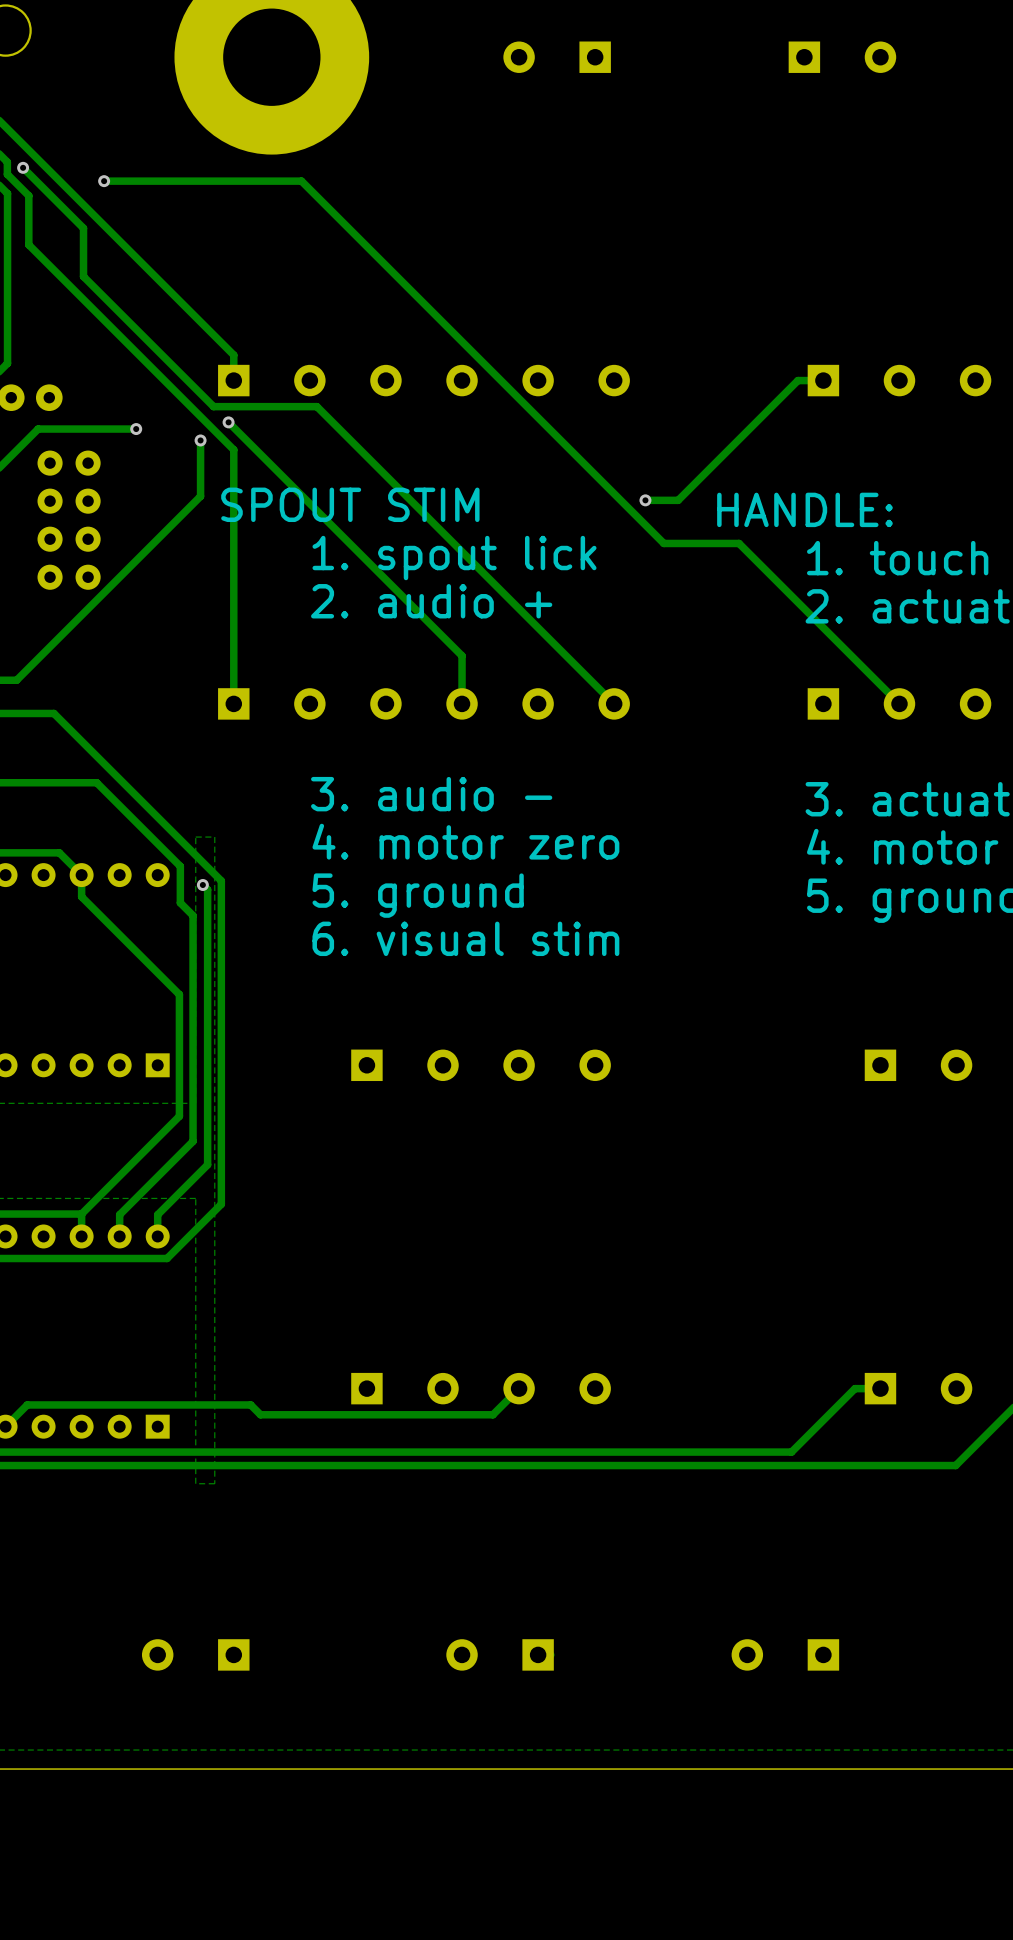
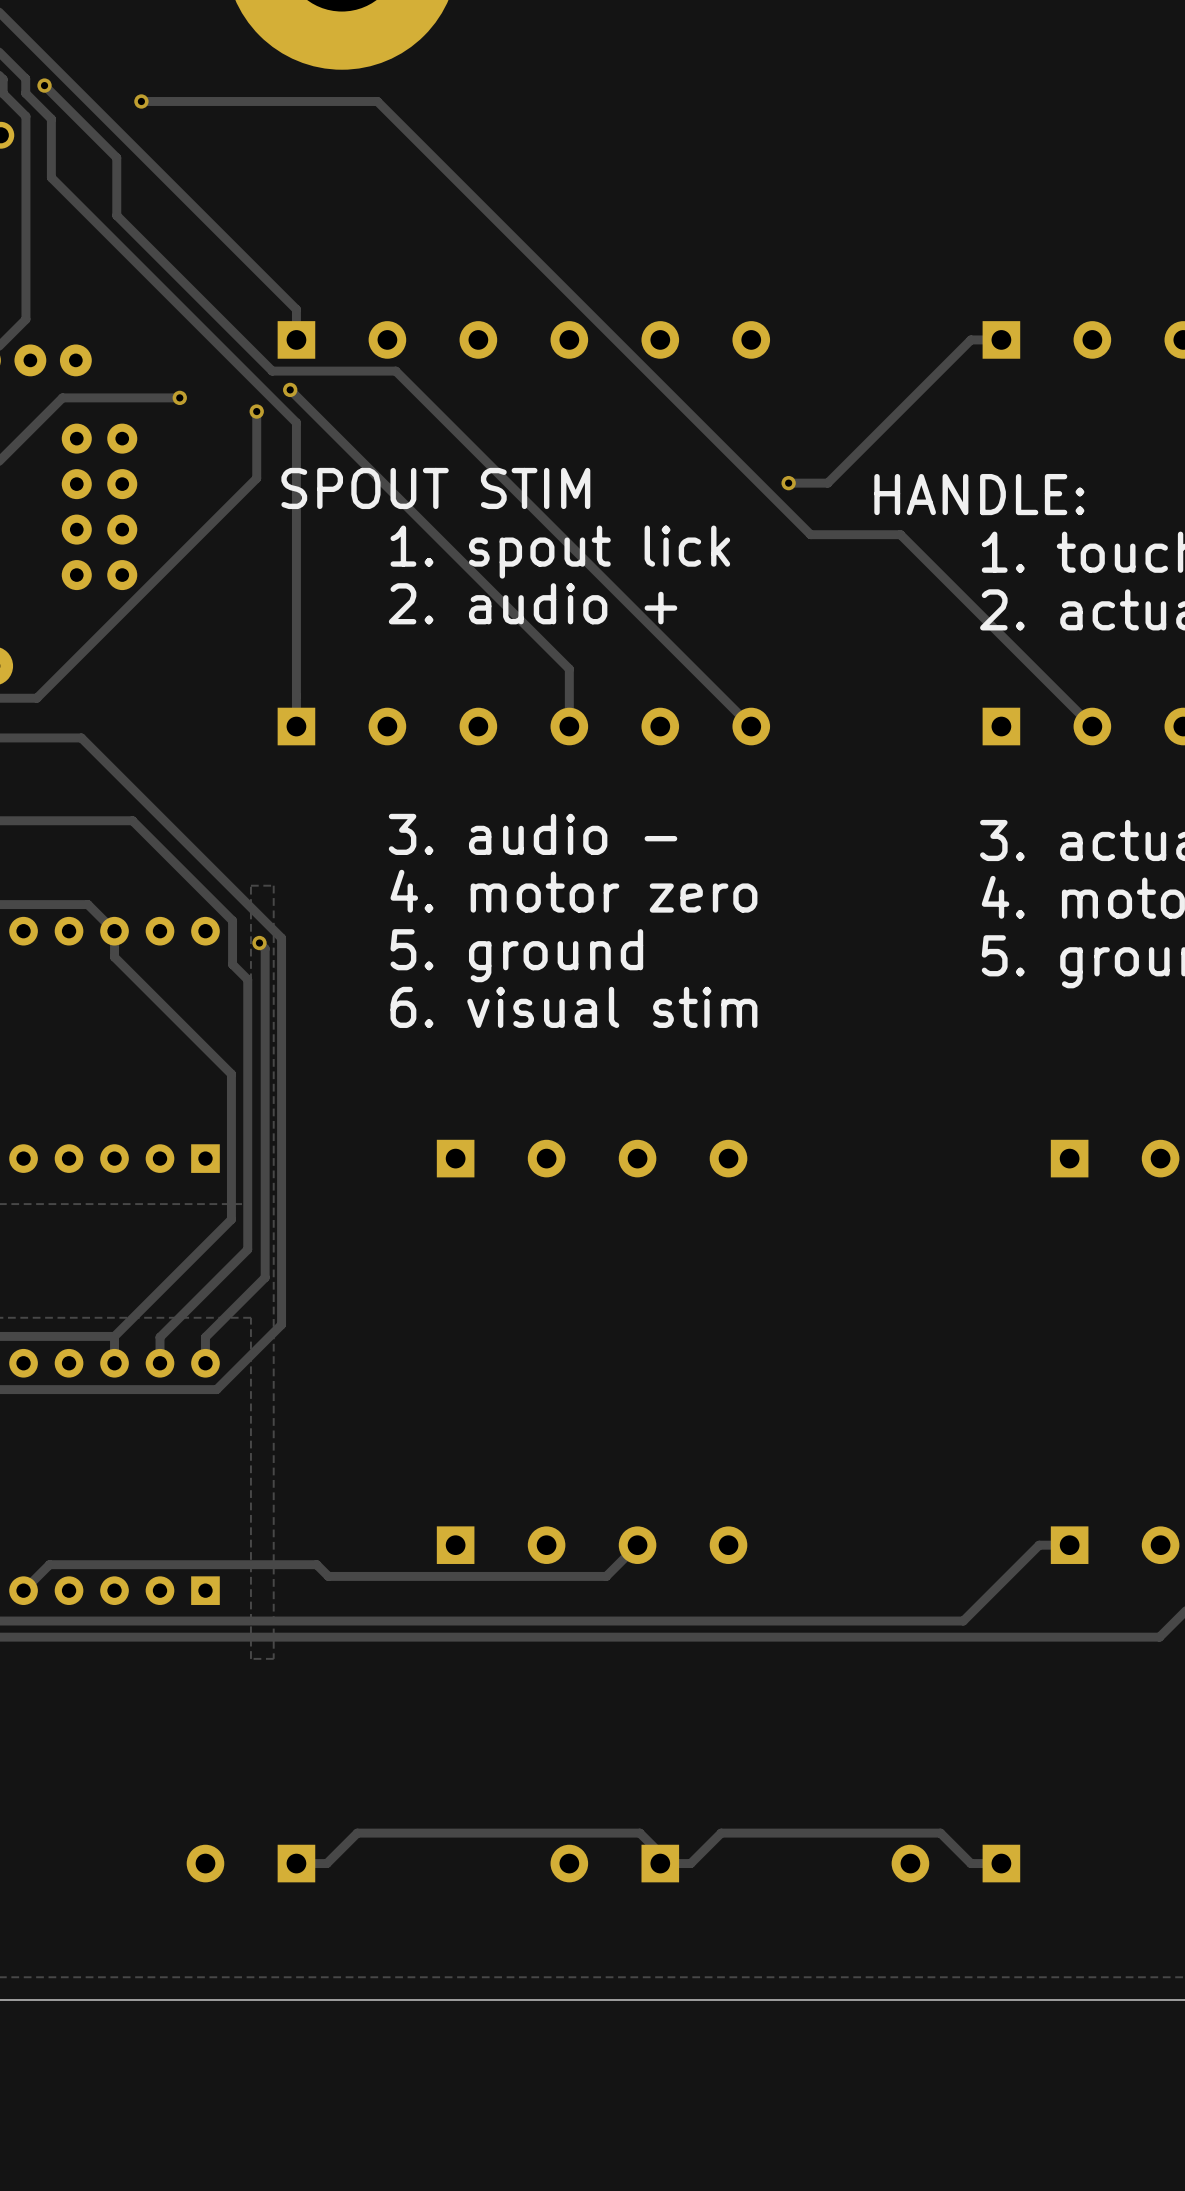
track: none -> (670, 1863) (639, 1833) (357, 1833) (326, 1863) (296, 1863)
track: none -> (1001, 1863) (970, 1863) (940, 1833) (721, 1833) (690, 1863) (675, 1863)

